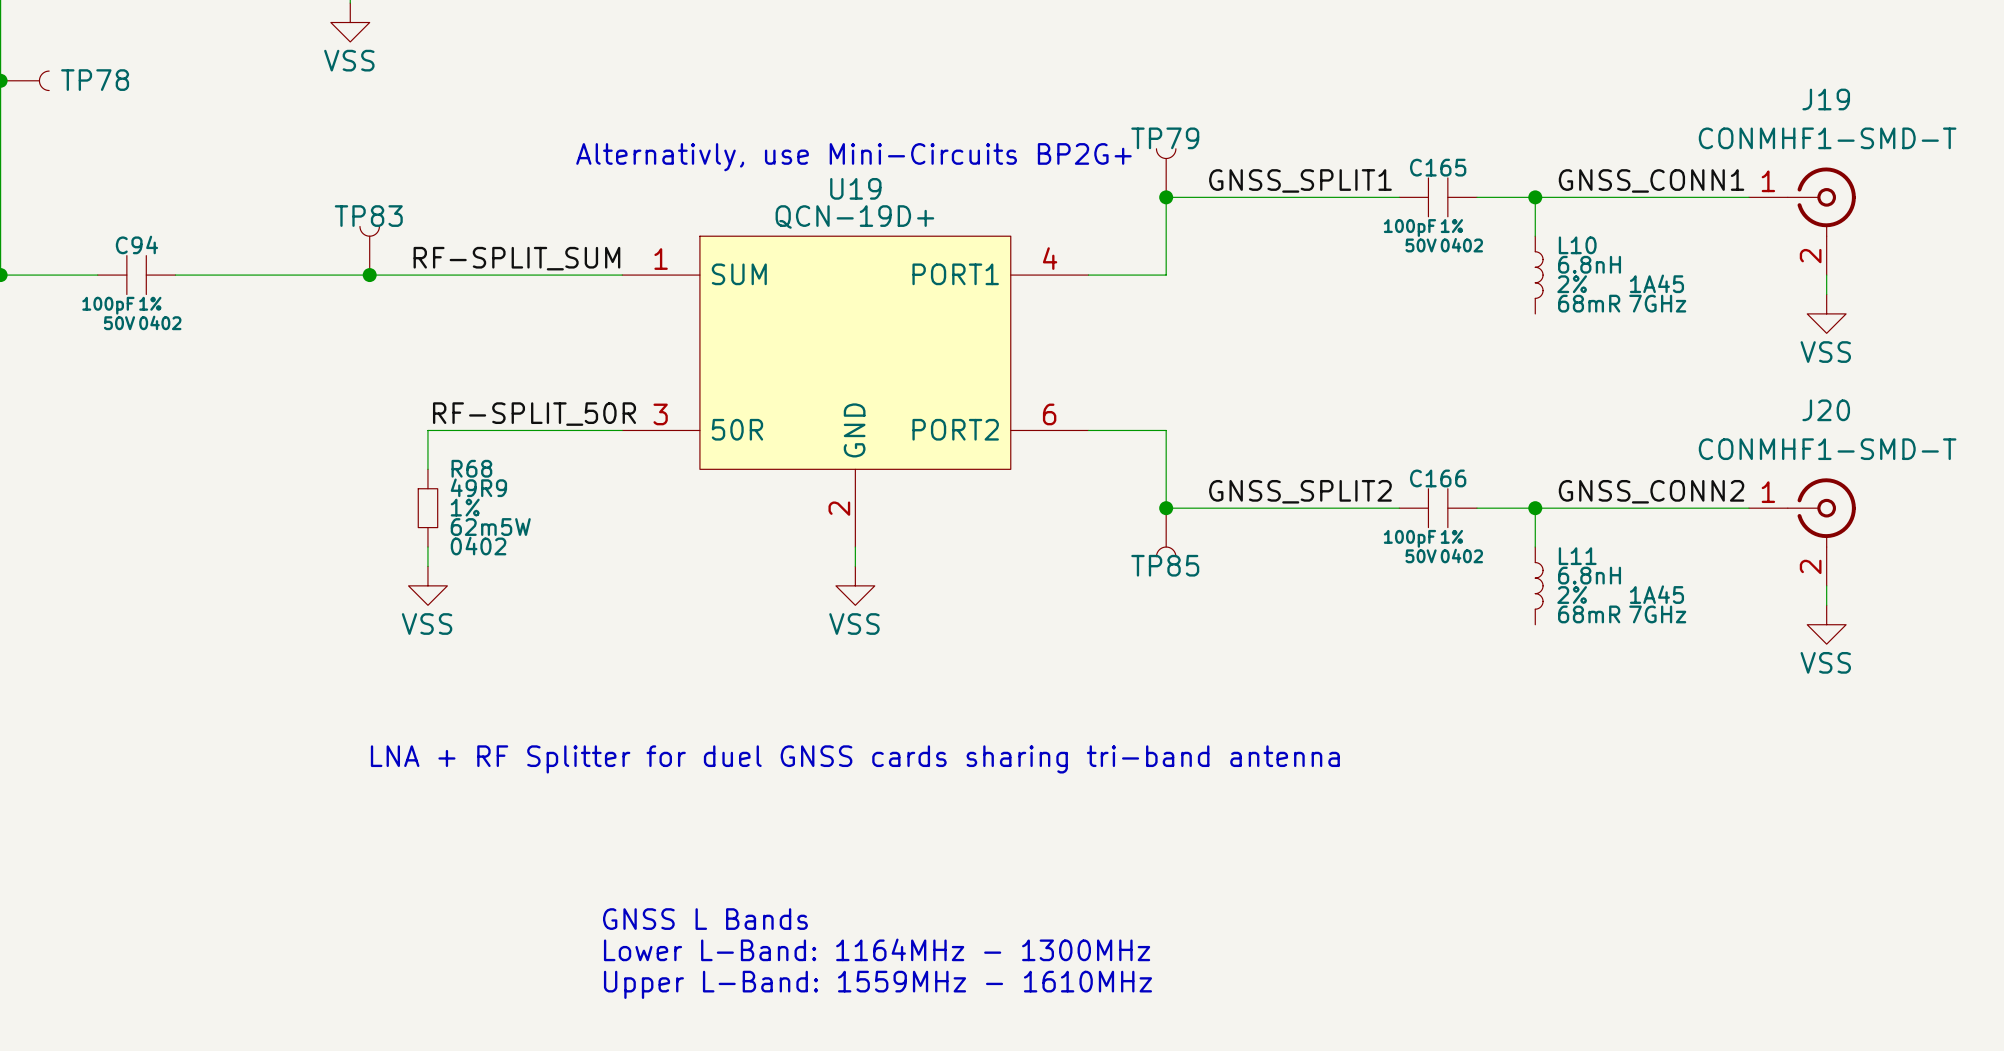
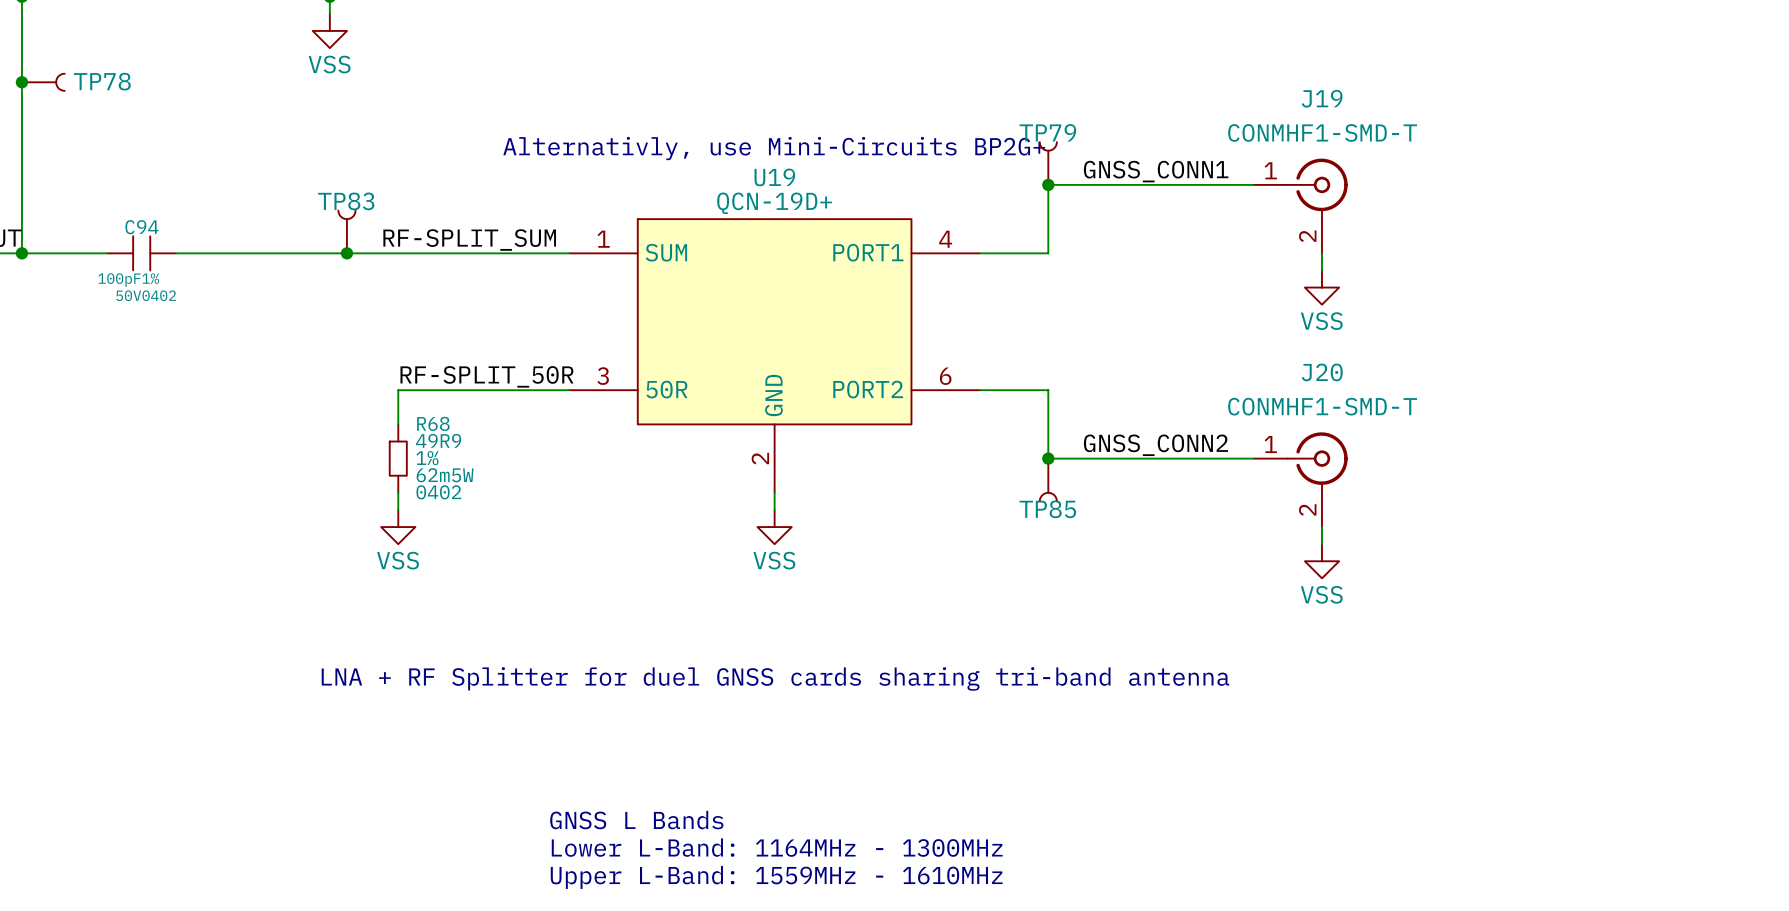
label: GNSS_SPLIT1 (1300, 180) -> GNSS_CONN1 (1156, 171)
label: GNSS_CONN1 (1651, 180) -> none
C165: 100pF (1438, 197) -> none
wire: (1477, 197) (1748, 197) -> none
wire: (1535, 197) (1535, 236) -> none
junction: (1535, 197) -> none
J19 position: (1802, 221) -> (1300, 205)
L10: 6.8nH (1539, 275) -> none
wire: (1826, 275) (1826, 294) -> (1322, 253) (1322, 270)
power symbol: none -> VSS (1322, 287)
power symbol: VSS (1826, 313) -> none
label: GNSS_SPLIT2 (1300, 491) -> GNSS_CONN2 (1155, 445)
label: GNSS_CONN2 (1651, 491) -> none
C166: 100pF (1438, 508) -> none
wire: (1477, 508) (1748, 508) -> none
wire: (1535, 508) (1535, 547) -> none
junction: (1535, 508) -> none
J20 position: (1802, 532) -> (1300, 479)
L11: 6.8nH (1539, 585) -> none
wire: (1826, 585) (1826, 605) -> (1322, 527) (1322, 544)
power symbol: none -> VSS (1322, 561)
power symbol: VSS (1826, 624) -> none

